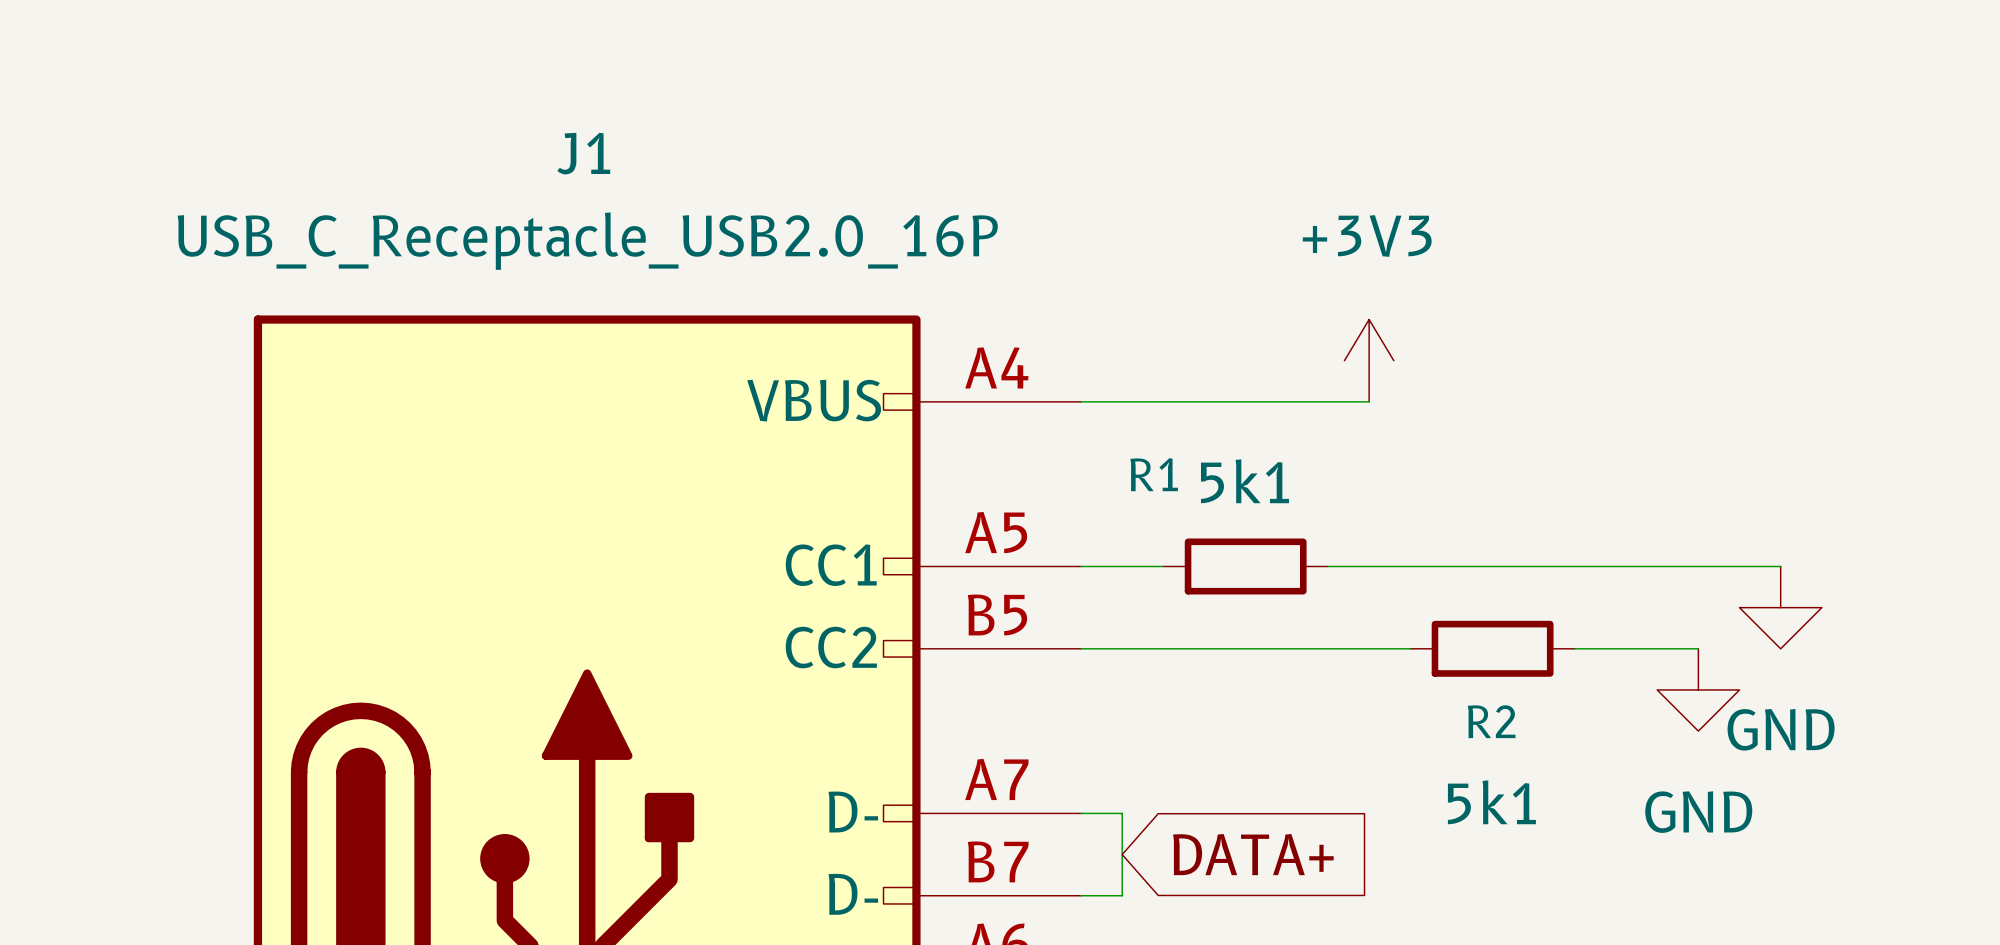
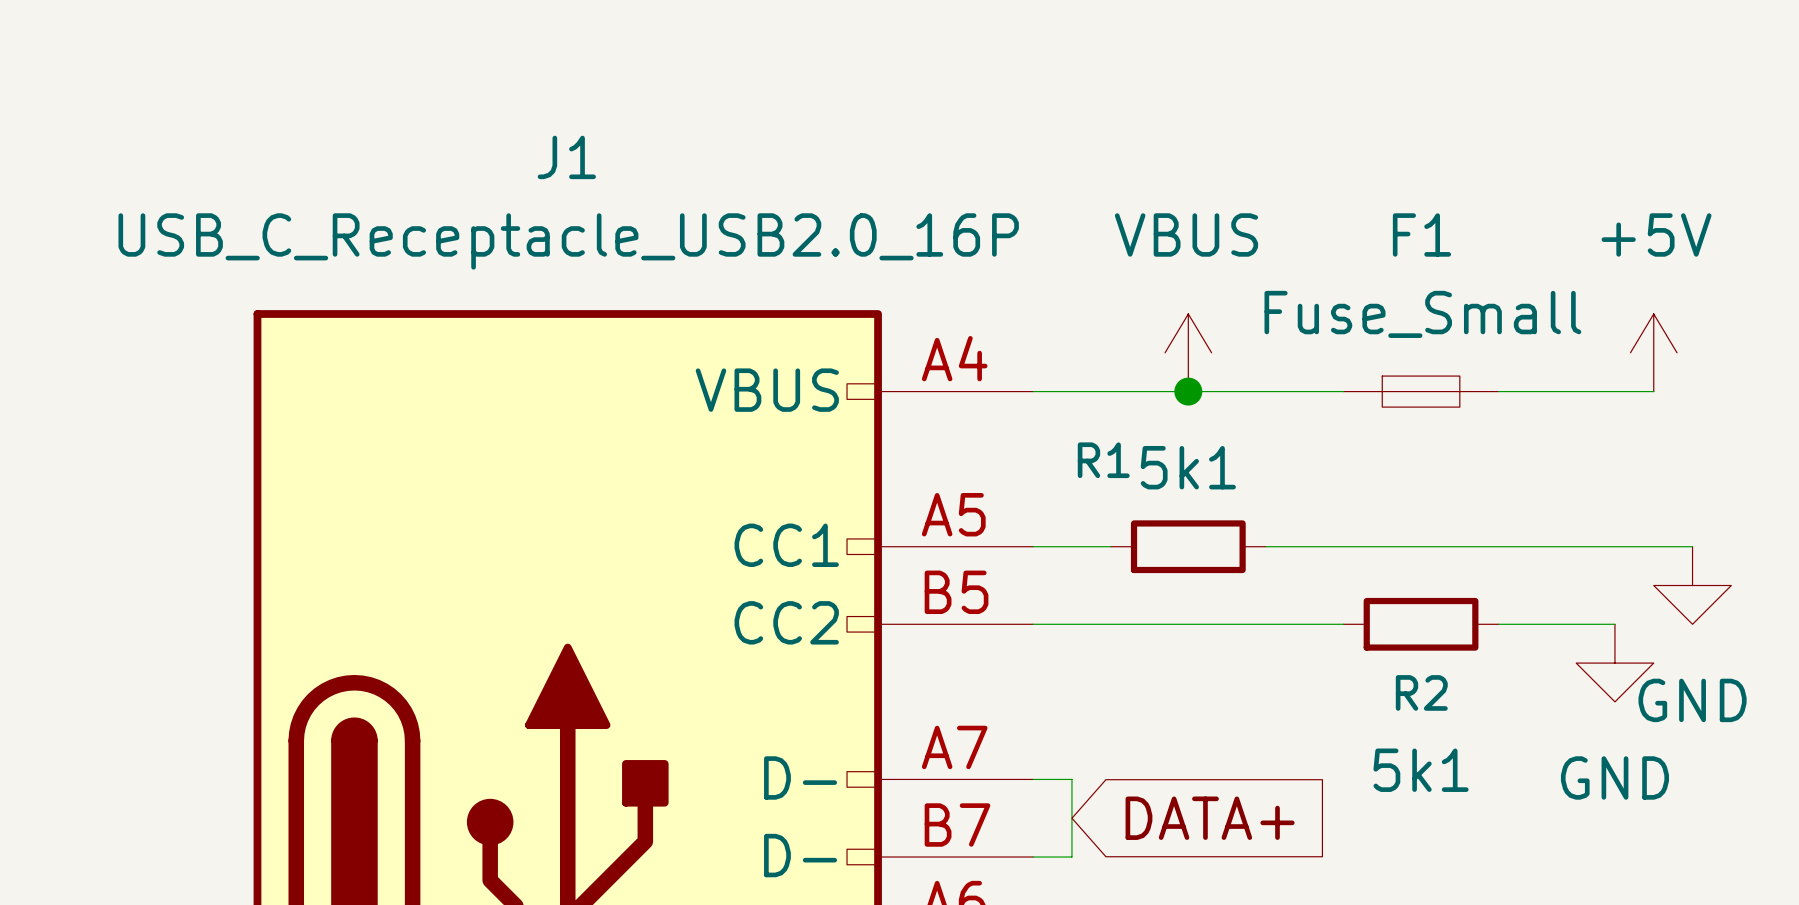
power symbol: none -> VBUS (1188, 352)
power symbol: +3V3 (1369, 360) -> none
power symbol: none -> +5V (1653, 352)
junction: none -> (1188, 391)
wire: none -> (1304, 391) (1343, 391)
F1: none -> Fuse_Small (1421, 391)
wire: none -> (1498, 391) (1653, 391)

